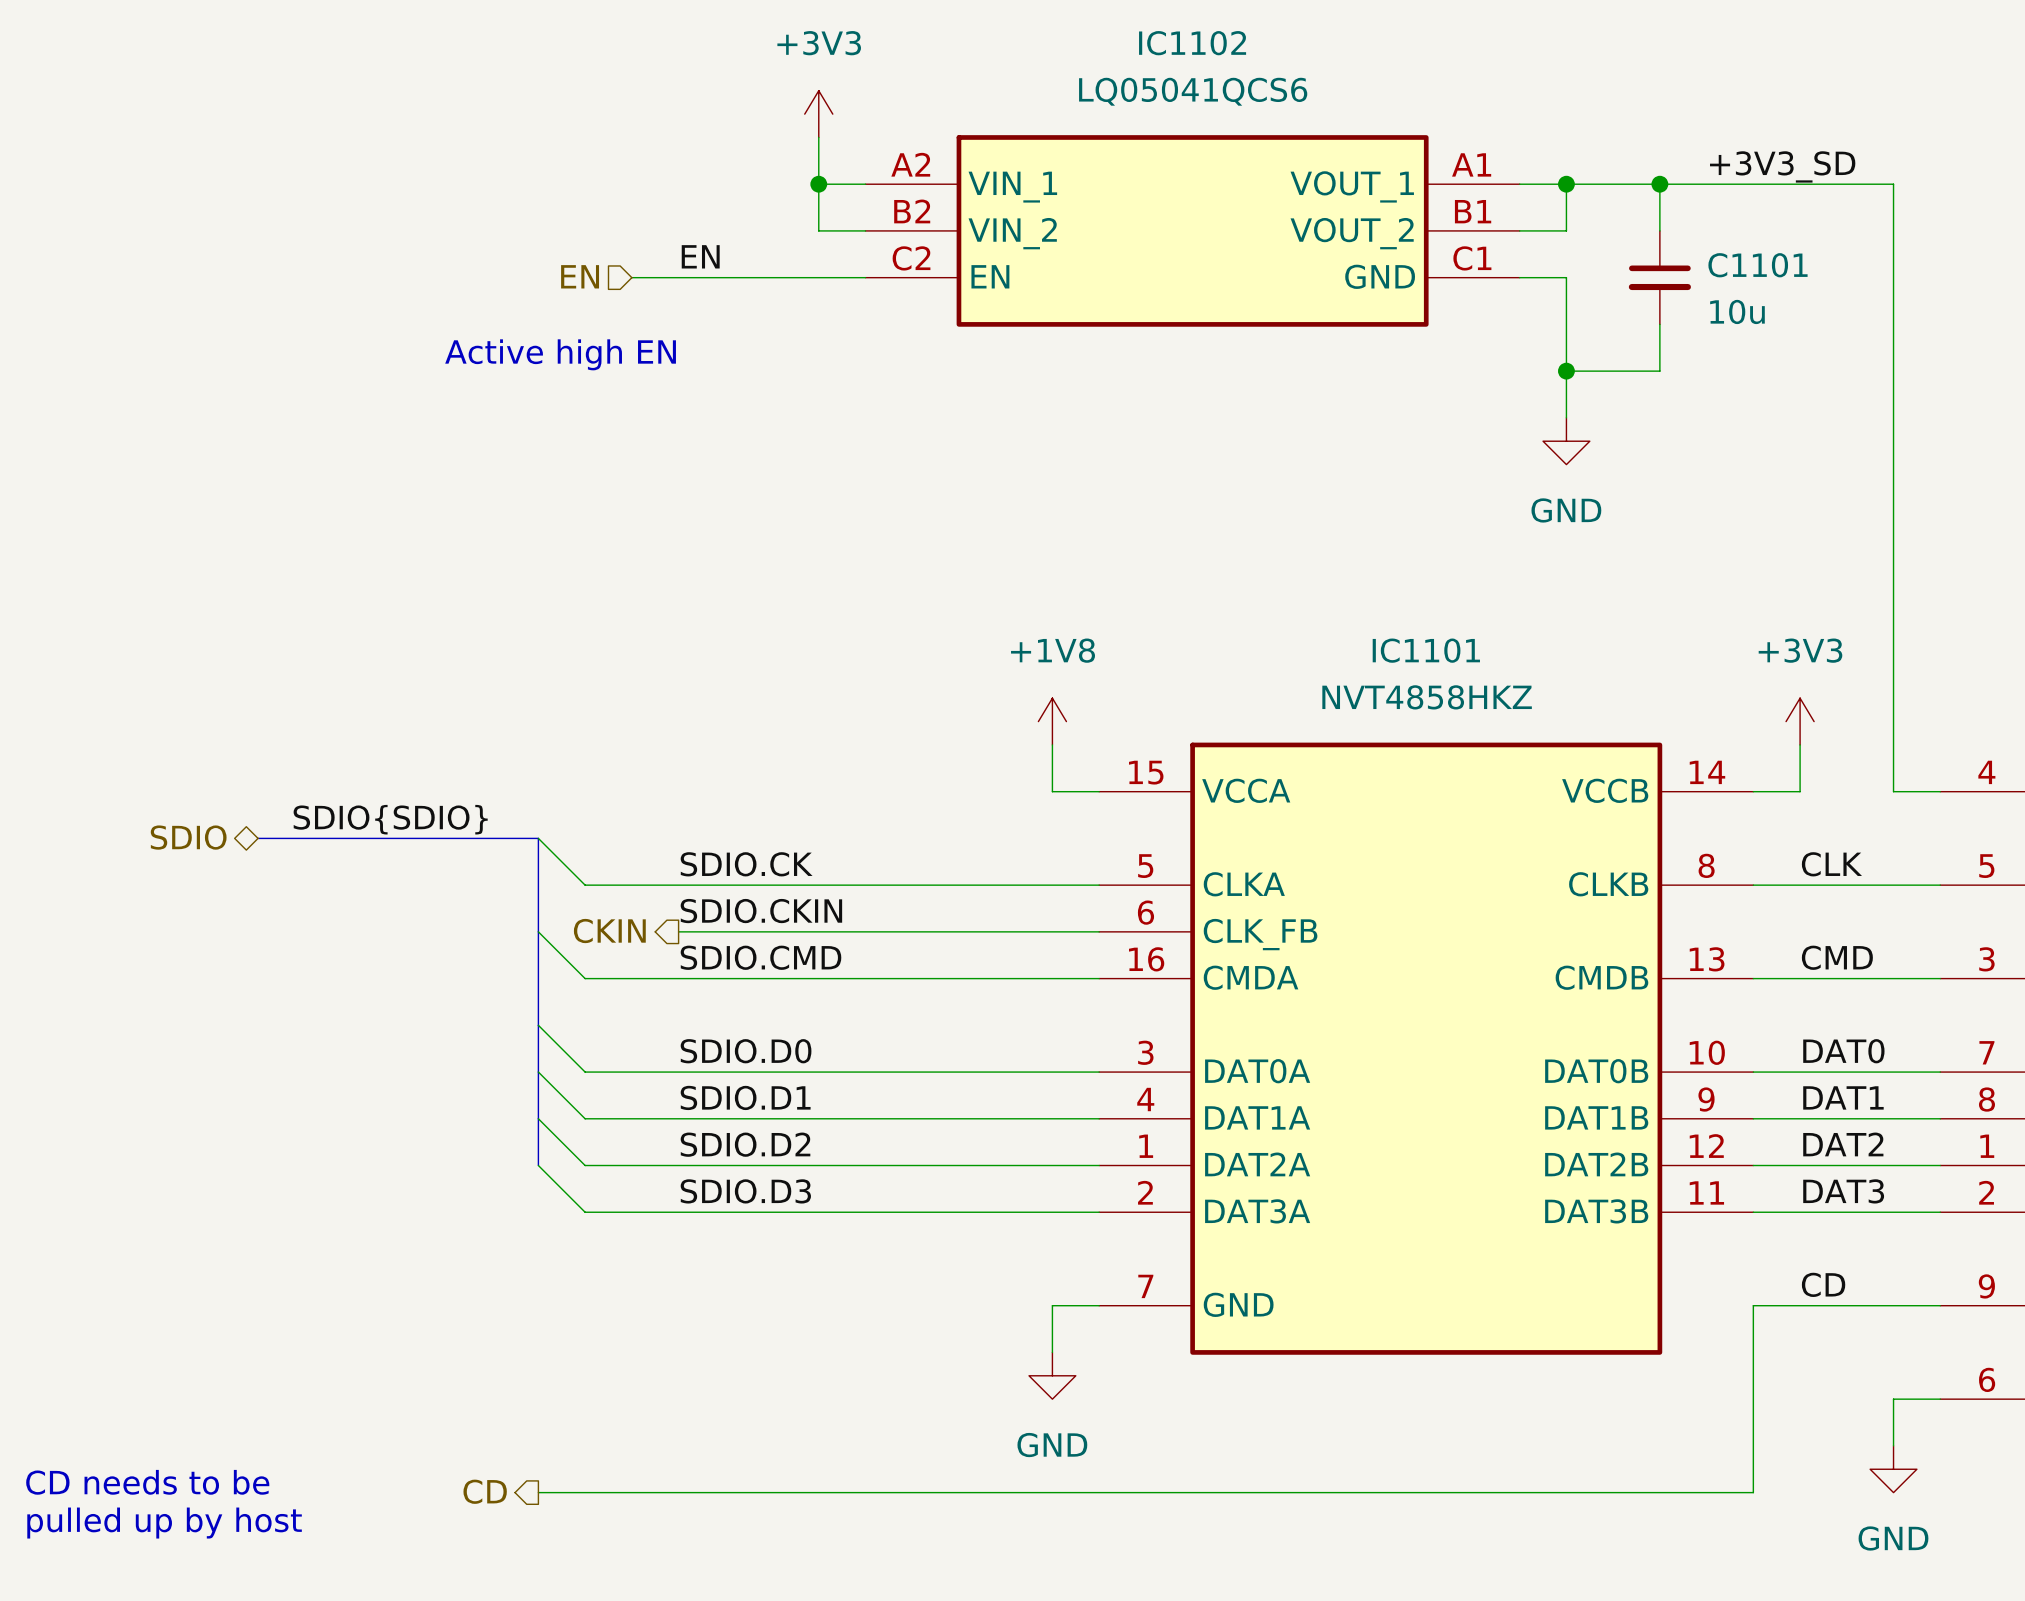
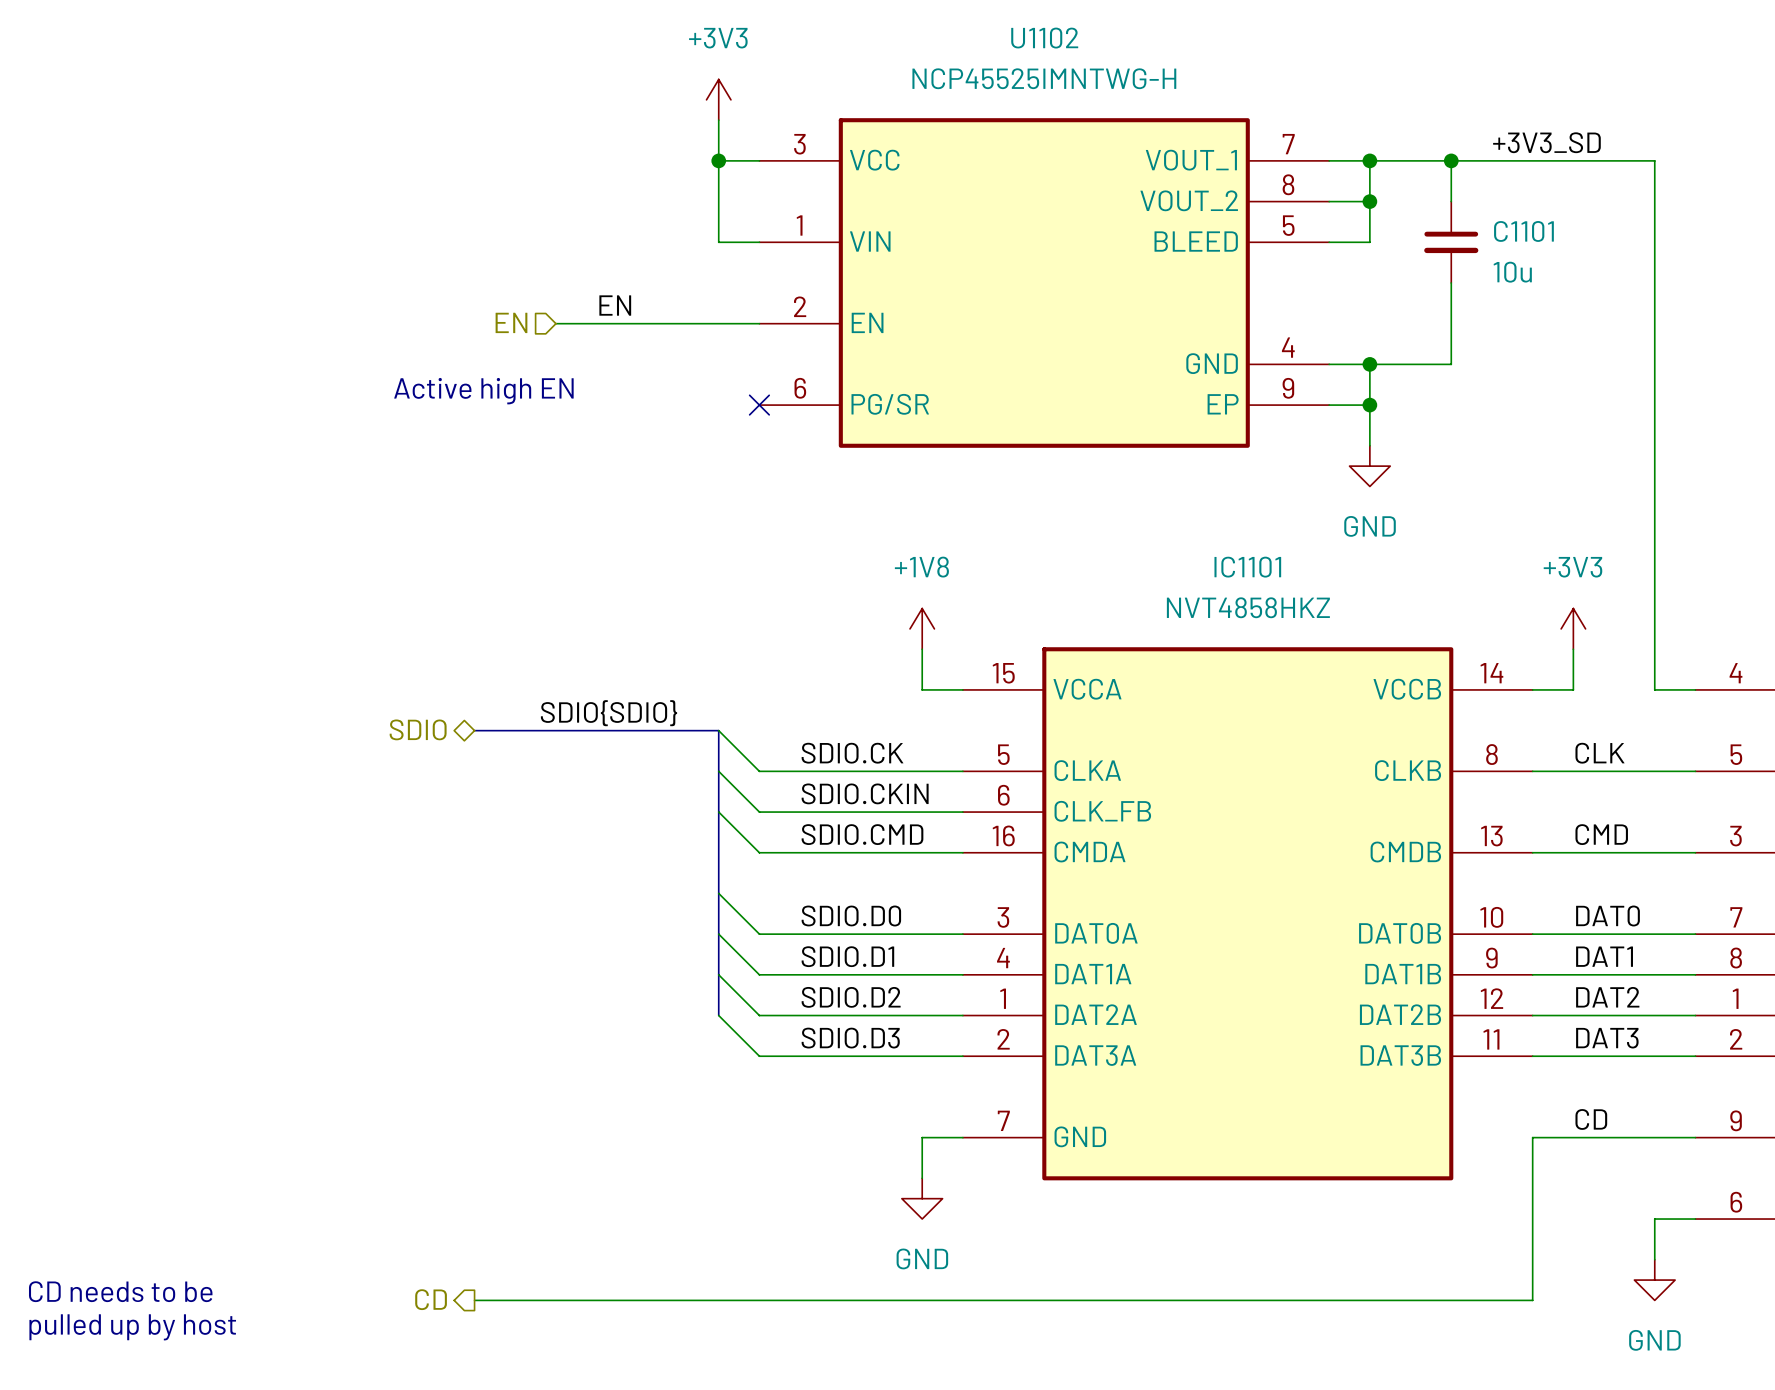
wire: (818, 230) (865, 230) -> (718, 201) (718, 242)
IC1102: LQ05041QCS6 (1192, 230) -> none
junction: none -> (1369, 201)
label position: EN (700, 256) -> EN (615, 305)
hierarchical label position: EN (580, 276) -> EN (511, 322)
wire: (631, 277) (818, 277) -> none
wire: (1566, 277) (1566, 417) -> (1369, 242) (1369, 201)
U1102: none -> NCP45525IMNTWG-H (1044, 282)
text position: Active high EN (560, 354) -> Active high EN (483, 391)
wire: none -> (555, 323) (759, 323)
wire: (1566, 371) (1659, 371) -> (1329, 364) (1451, 364) (1451, 323)
junction: (1566, 371) -> none
wire: none -> (1369, 364) (1369, 445)
junction: none -> (1369, 364)
power symbol position: GND (1566, 441) -> GND (1369, 466)
no-connect mark: none -> (759, 405)
wire: none -> (1329, 405) (1369, 405)
junction: none -> (1369, 405)
label position: SDIO{SDIO} (390, 819) -> SDIO{SDIO} (609, 713)
hierarchical label position: SDIO (188, 837) -> SDIO (418, 729)
bus: (258, 838) (538, 838) (538, 1165) -> (474, 730) (718, 730) (718, 1015)
wire: (538, 838) (585, 885) (865, 885) -> (718, 730) (759, 771)
label position: SDIO.CK (746, 864) -> SDIO.CK (852, 753)
label position: SDIO.CKIN (761, 911) -> SDIO.CKIN (865, 793)
wire: (538, 931) (585, 978) (865, 978) -> (718, 812) (759, 852)
hierarchical label: CKIN (609, 931) -> none
wire: (678, 931) (865, 931) -> (718, 771) (759, 812)
label position: SDIO.CMD (760, 957) -> SDIO.CMD (862, 834)
wire: (538, 1025) (585, 1072) (865, 1072) -> (718, 893) (759, 934)
label position: SDIO.D0 (746, 1051) -> SDIO.D0 (851, 915)
wire: (538, 1072) (585, 1118) (865, 1118) -> (718, 934) (759, 974)
label position: SDIO.D1 (745, 1097) -> SDIO.D1 (847, 956)
wire: (538, 1118) (585, 1165) (865, 1165) -> (718, 974) (759, 1015)
label position: SDIO.D2 (745, 1144) -> SDIO.D2 (851, 997)
wire: (538, 1165) (585, 1212) (865, 1212) -> (718, 1015) (759, 1056)
label position: SDIO.D3 (745, 1191) -> SDIO.D3 (850, 1038)

